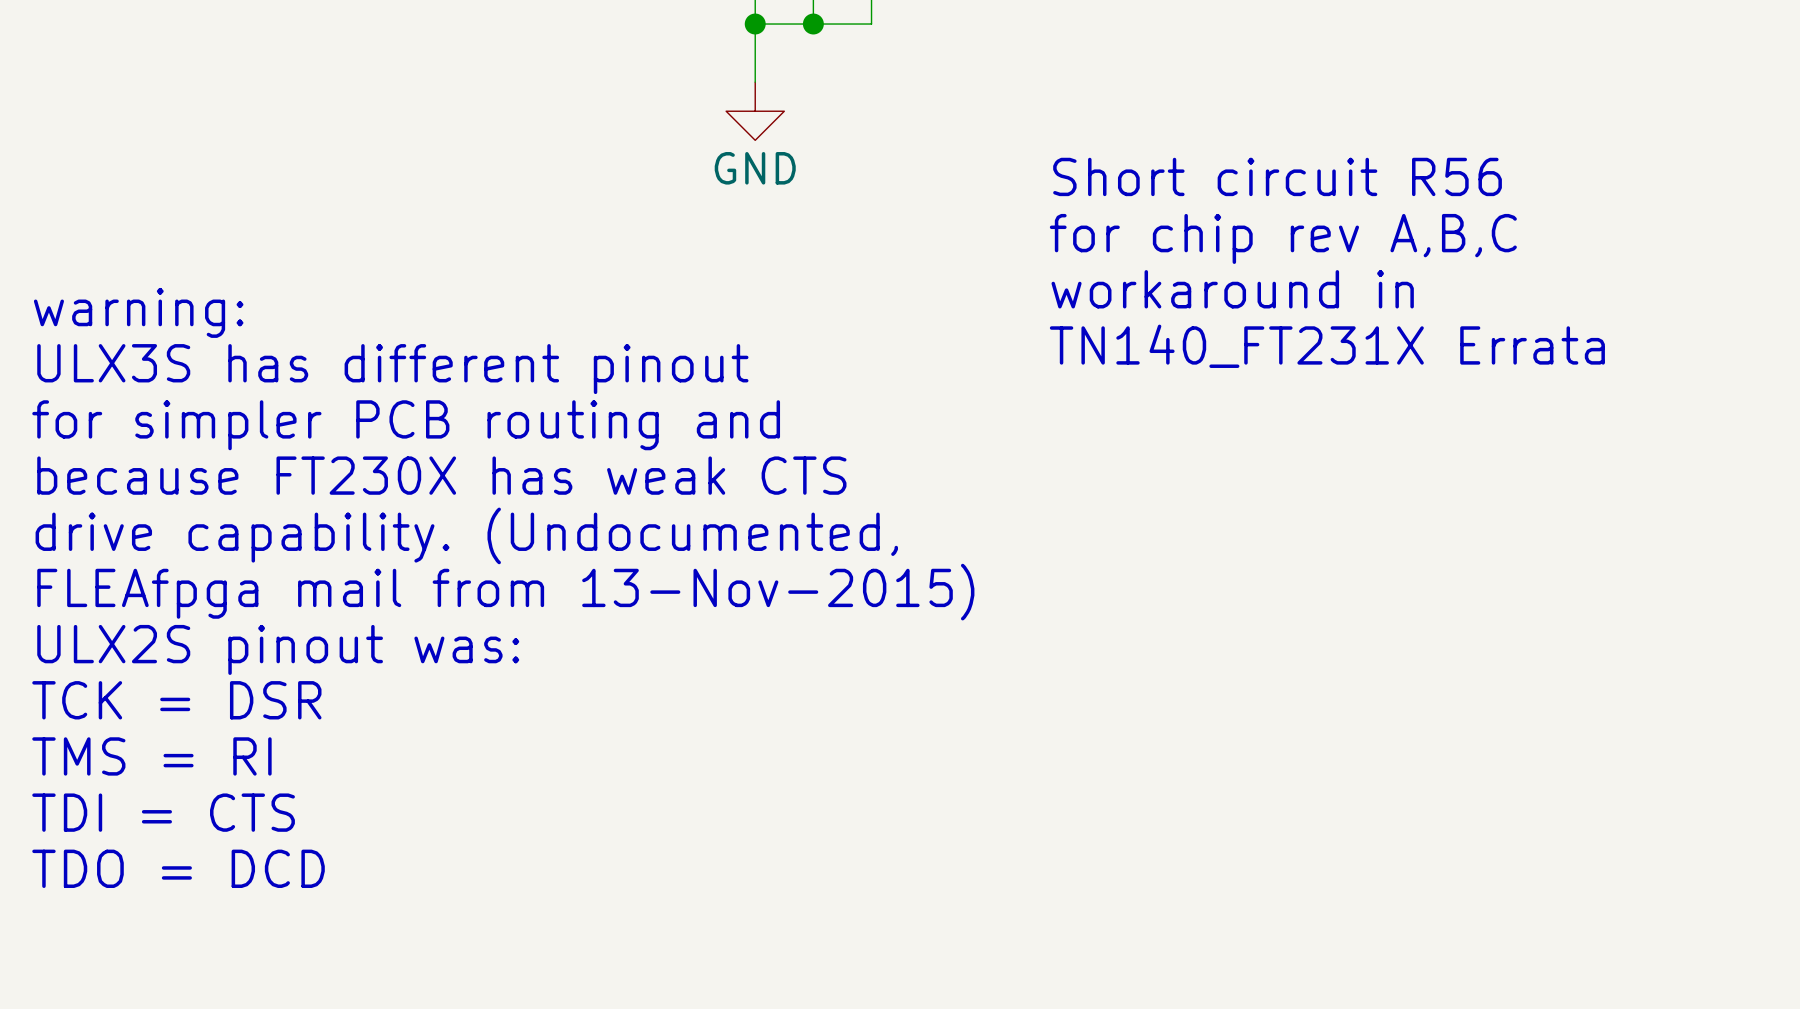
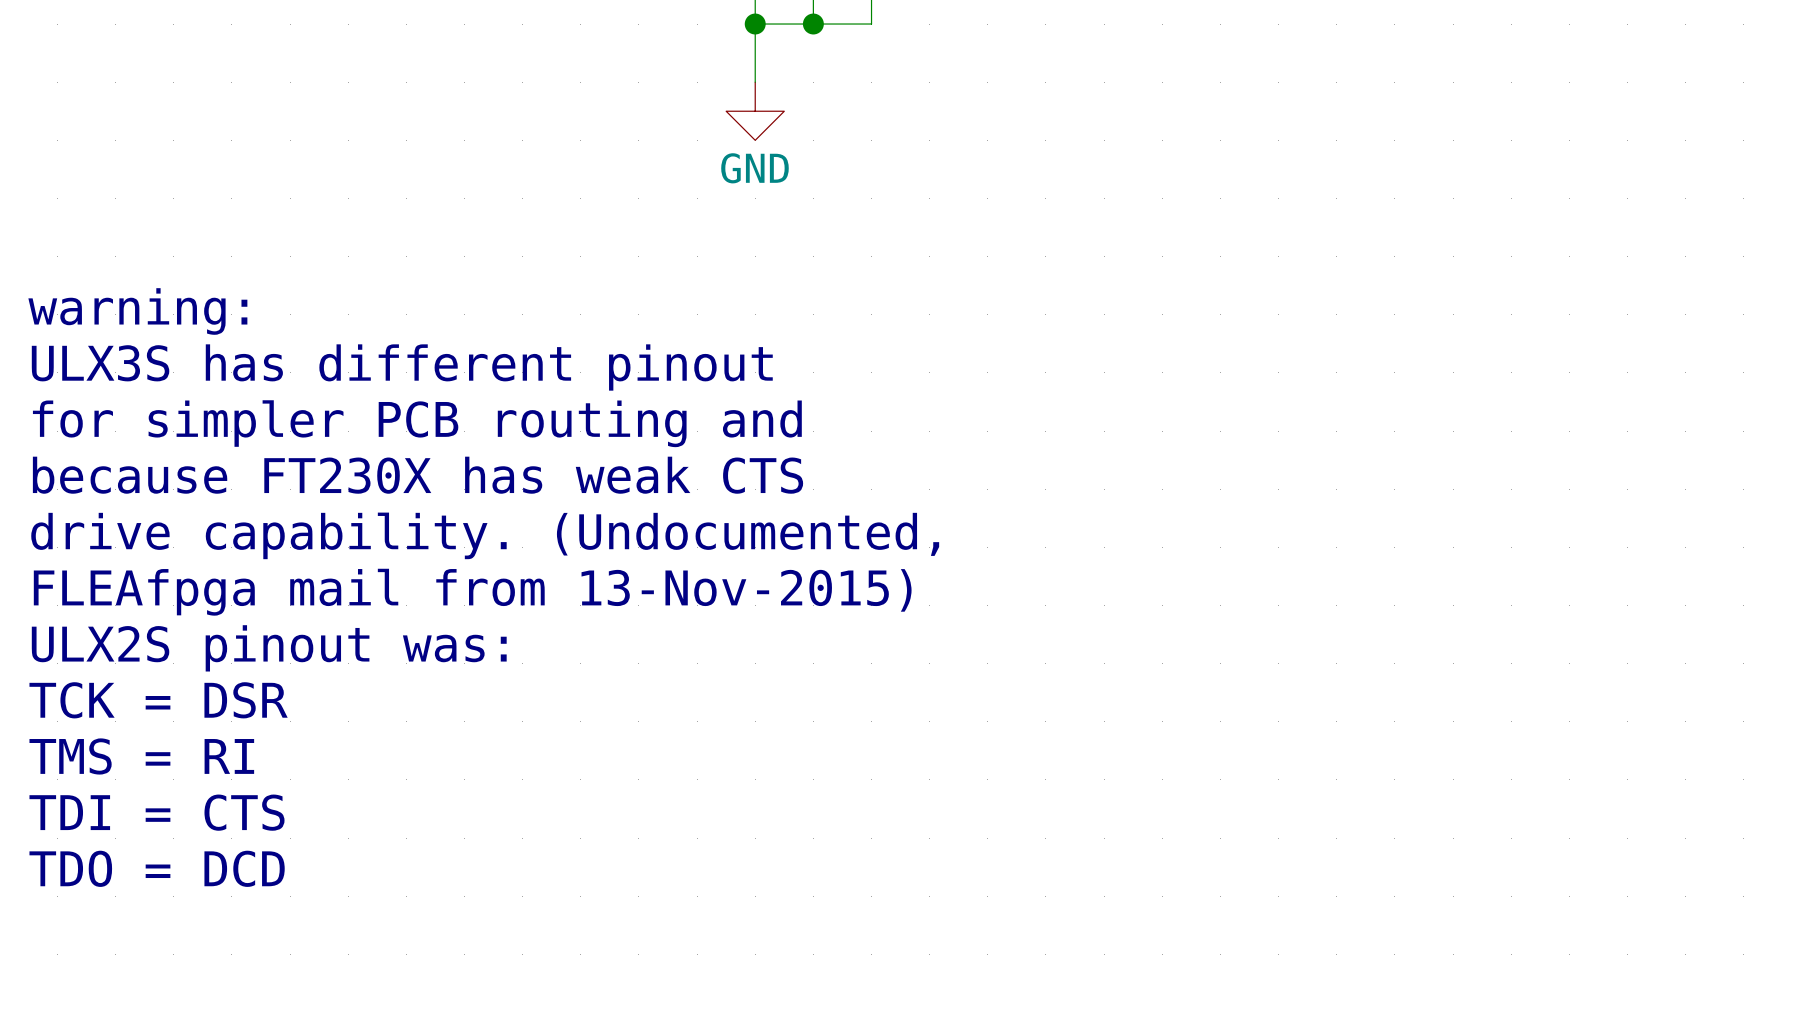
text: Short circuit R56 (1277, 176) -> none
text: for chip rev A,B,C (1283, 238) -> none
text: workaround in (1232, 289) -> none
text: TN140_FT231X Errata (1327, 346) -> none

